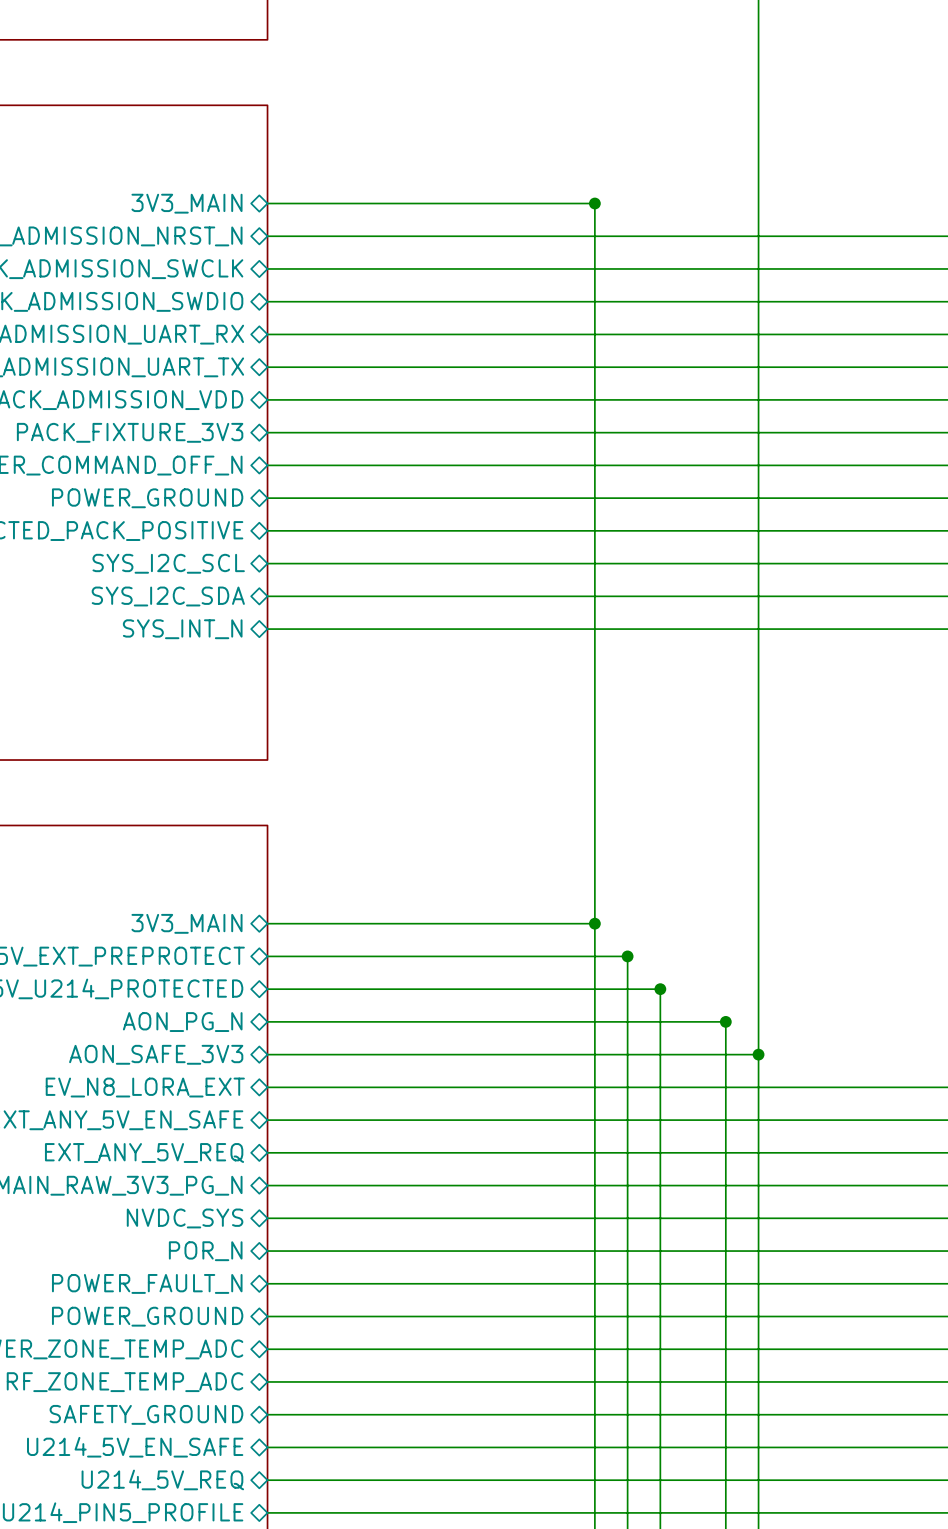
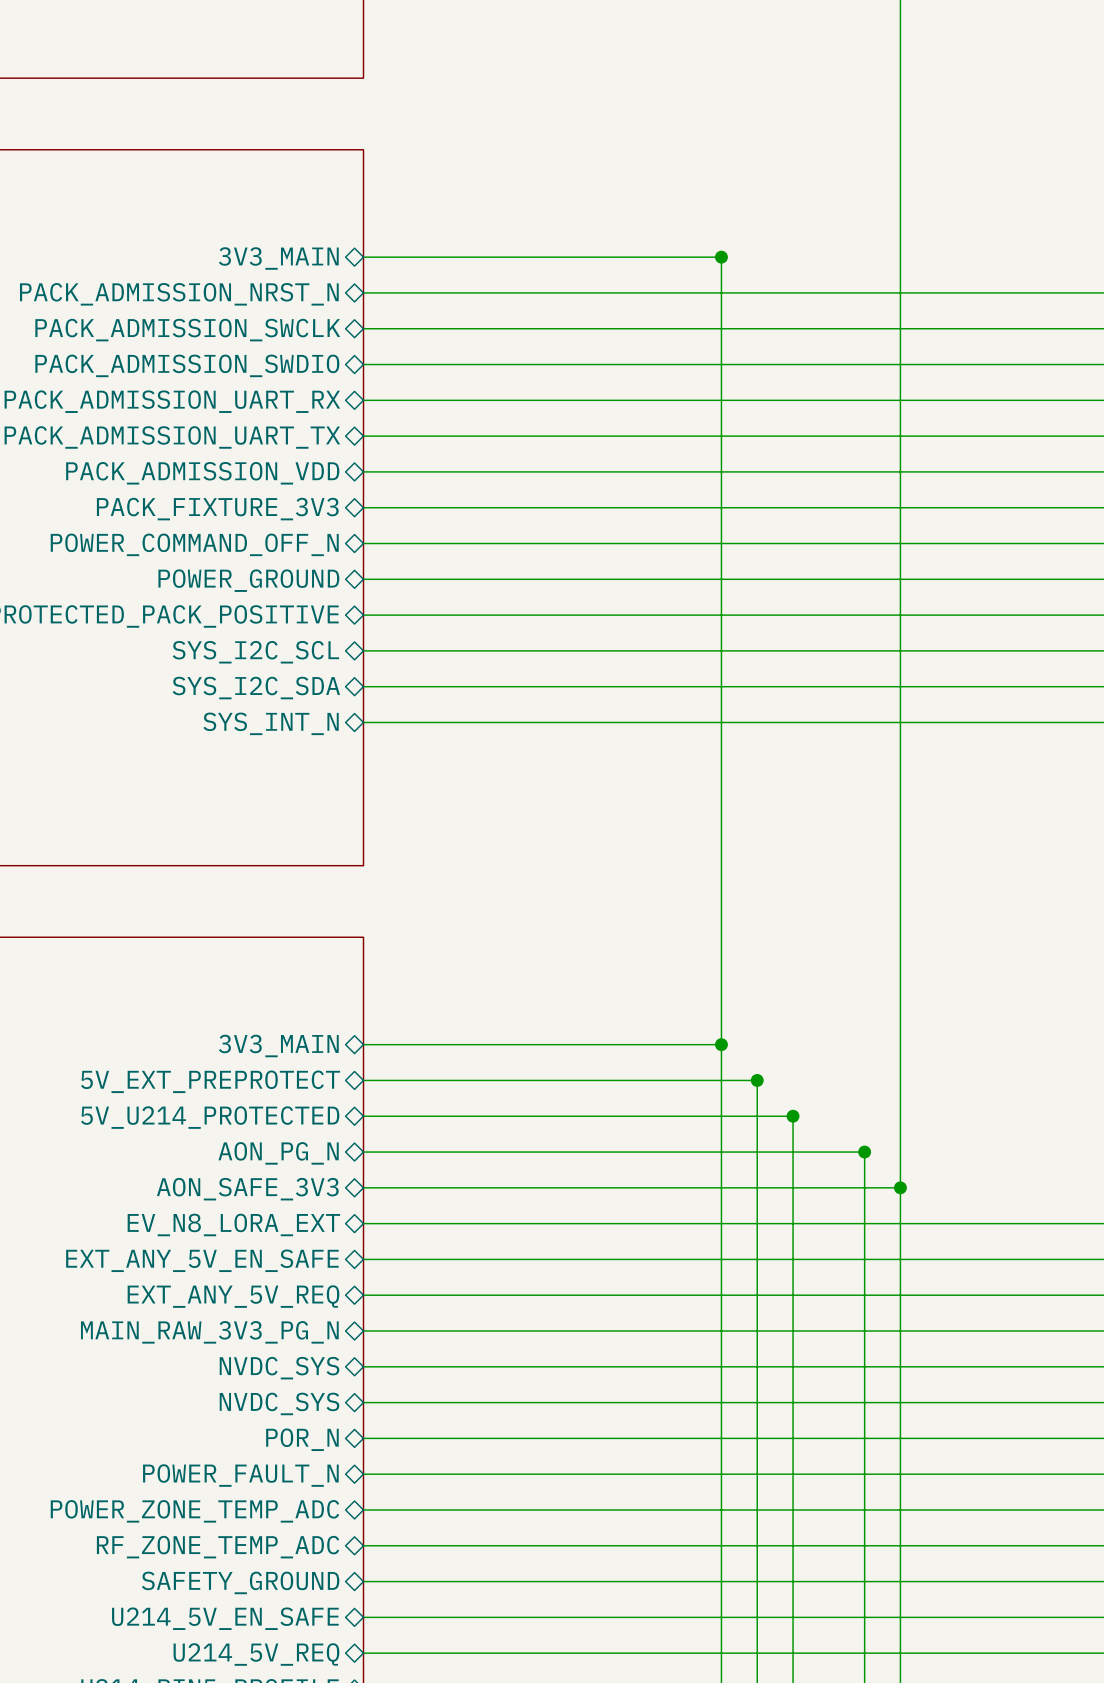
sheet pin: POR_N (205, 1251) -> NVDC_SYS (279, 1403)
sheet pin: POWER_FAULT_N (147, 1283) -> POR_N (302, 1439)
sheet pin: POWER_GROUND (147, 1316) -> POWER_FAULT_N (240, 1475)

